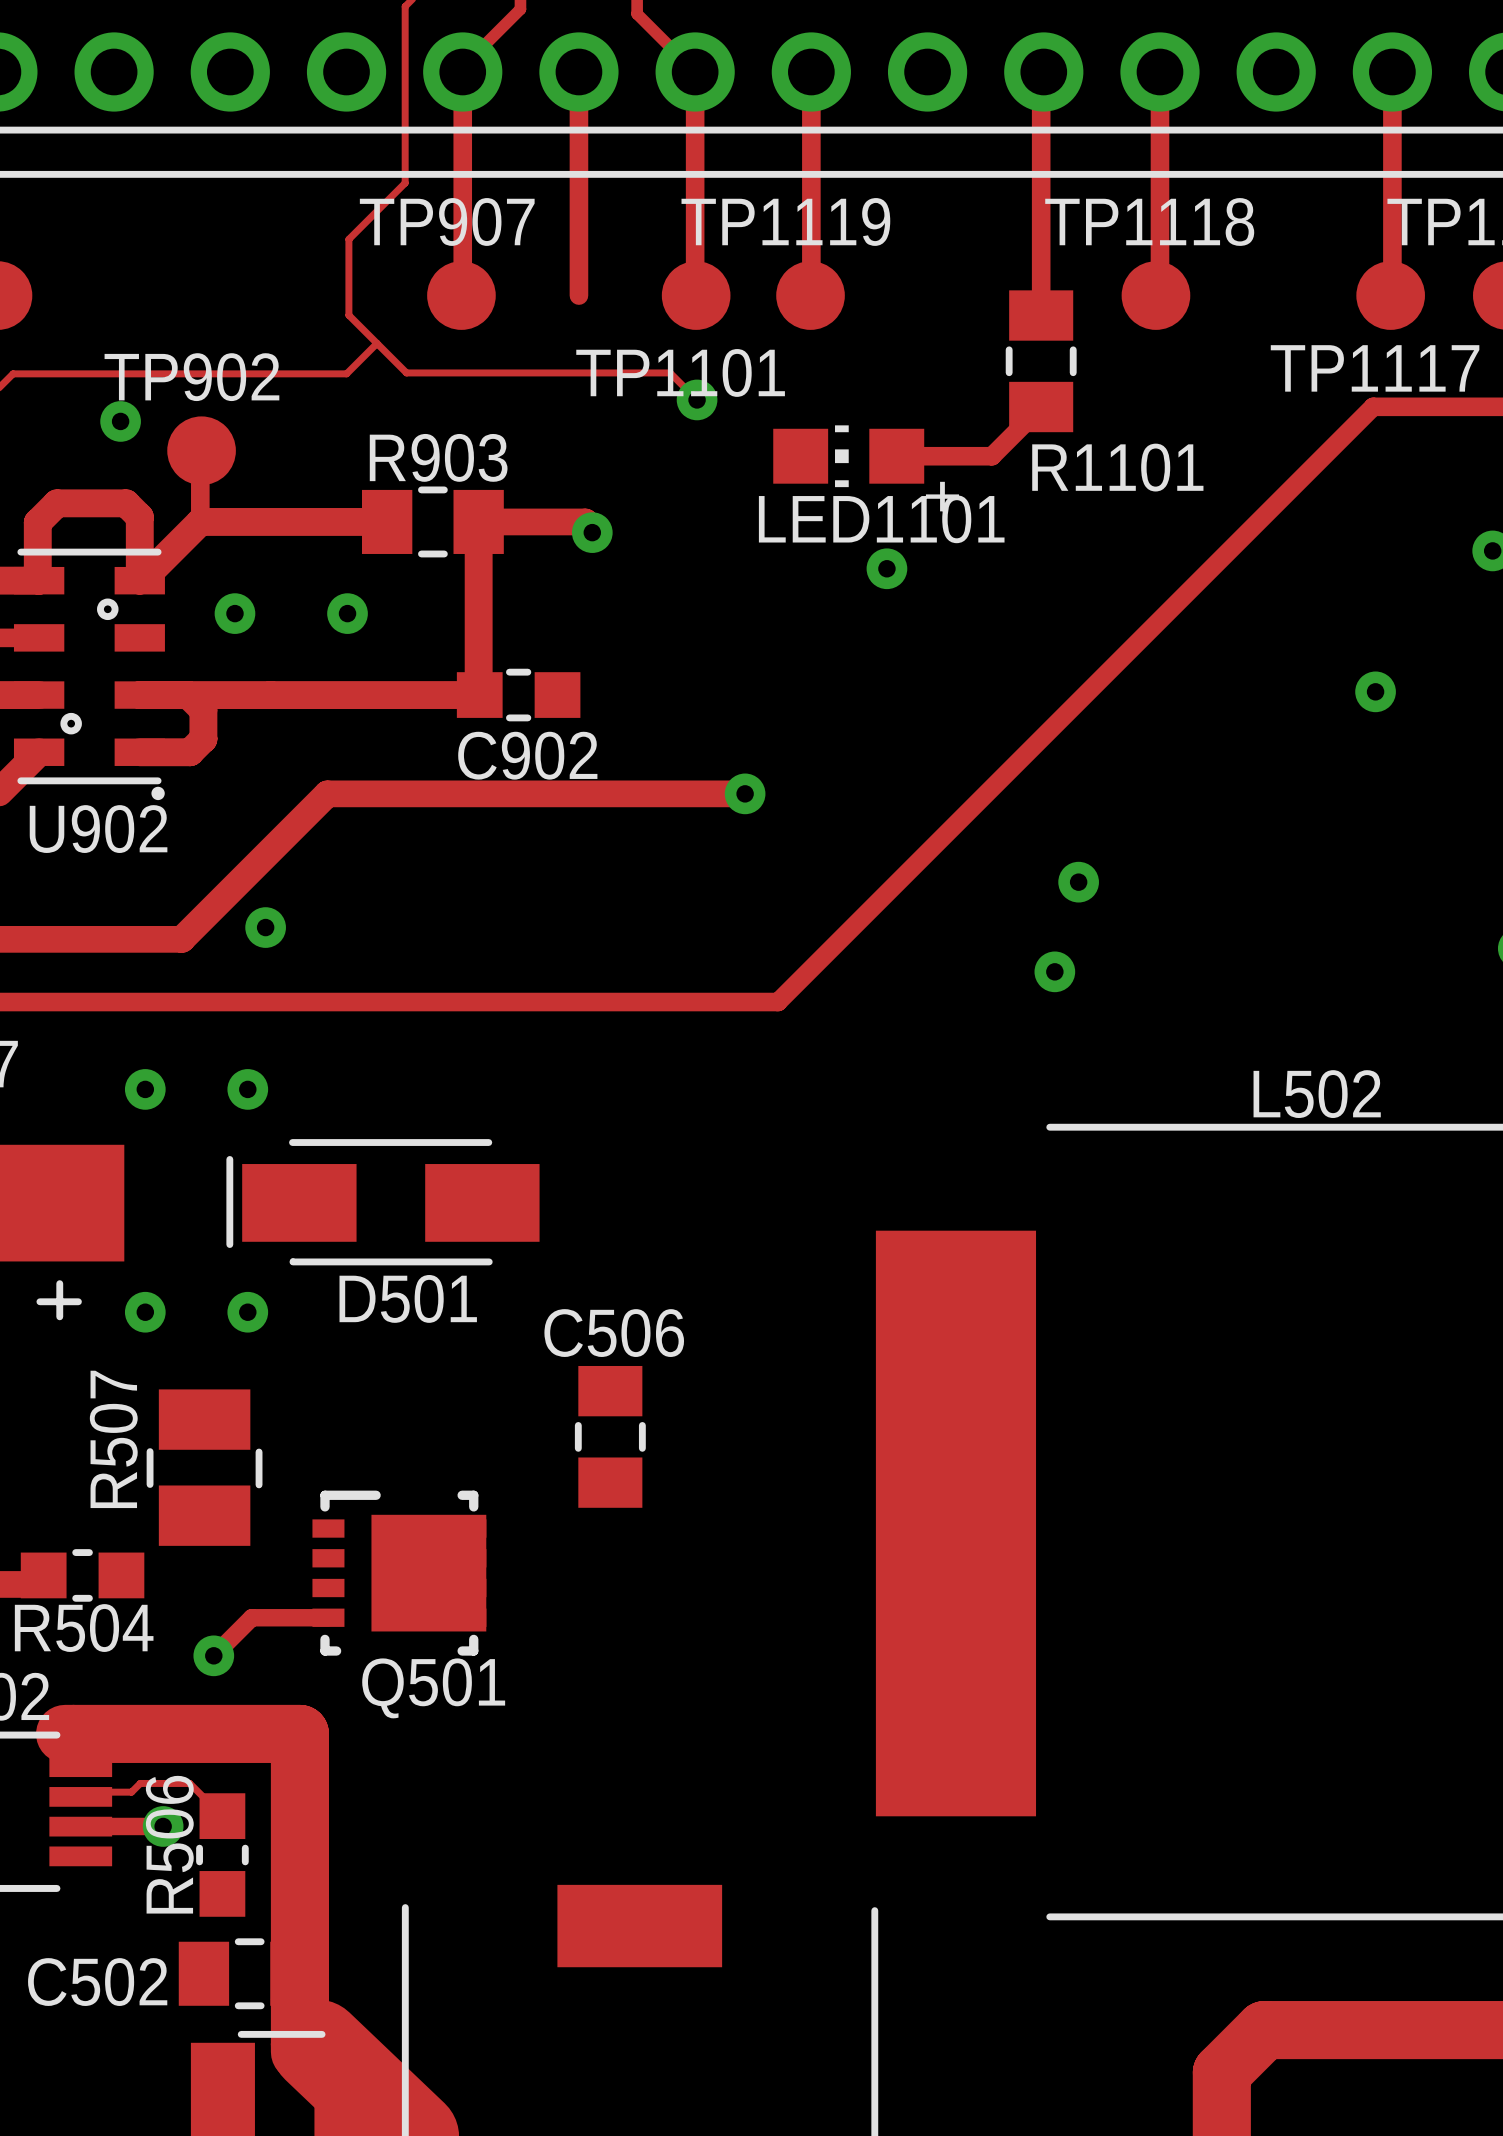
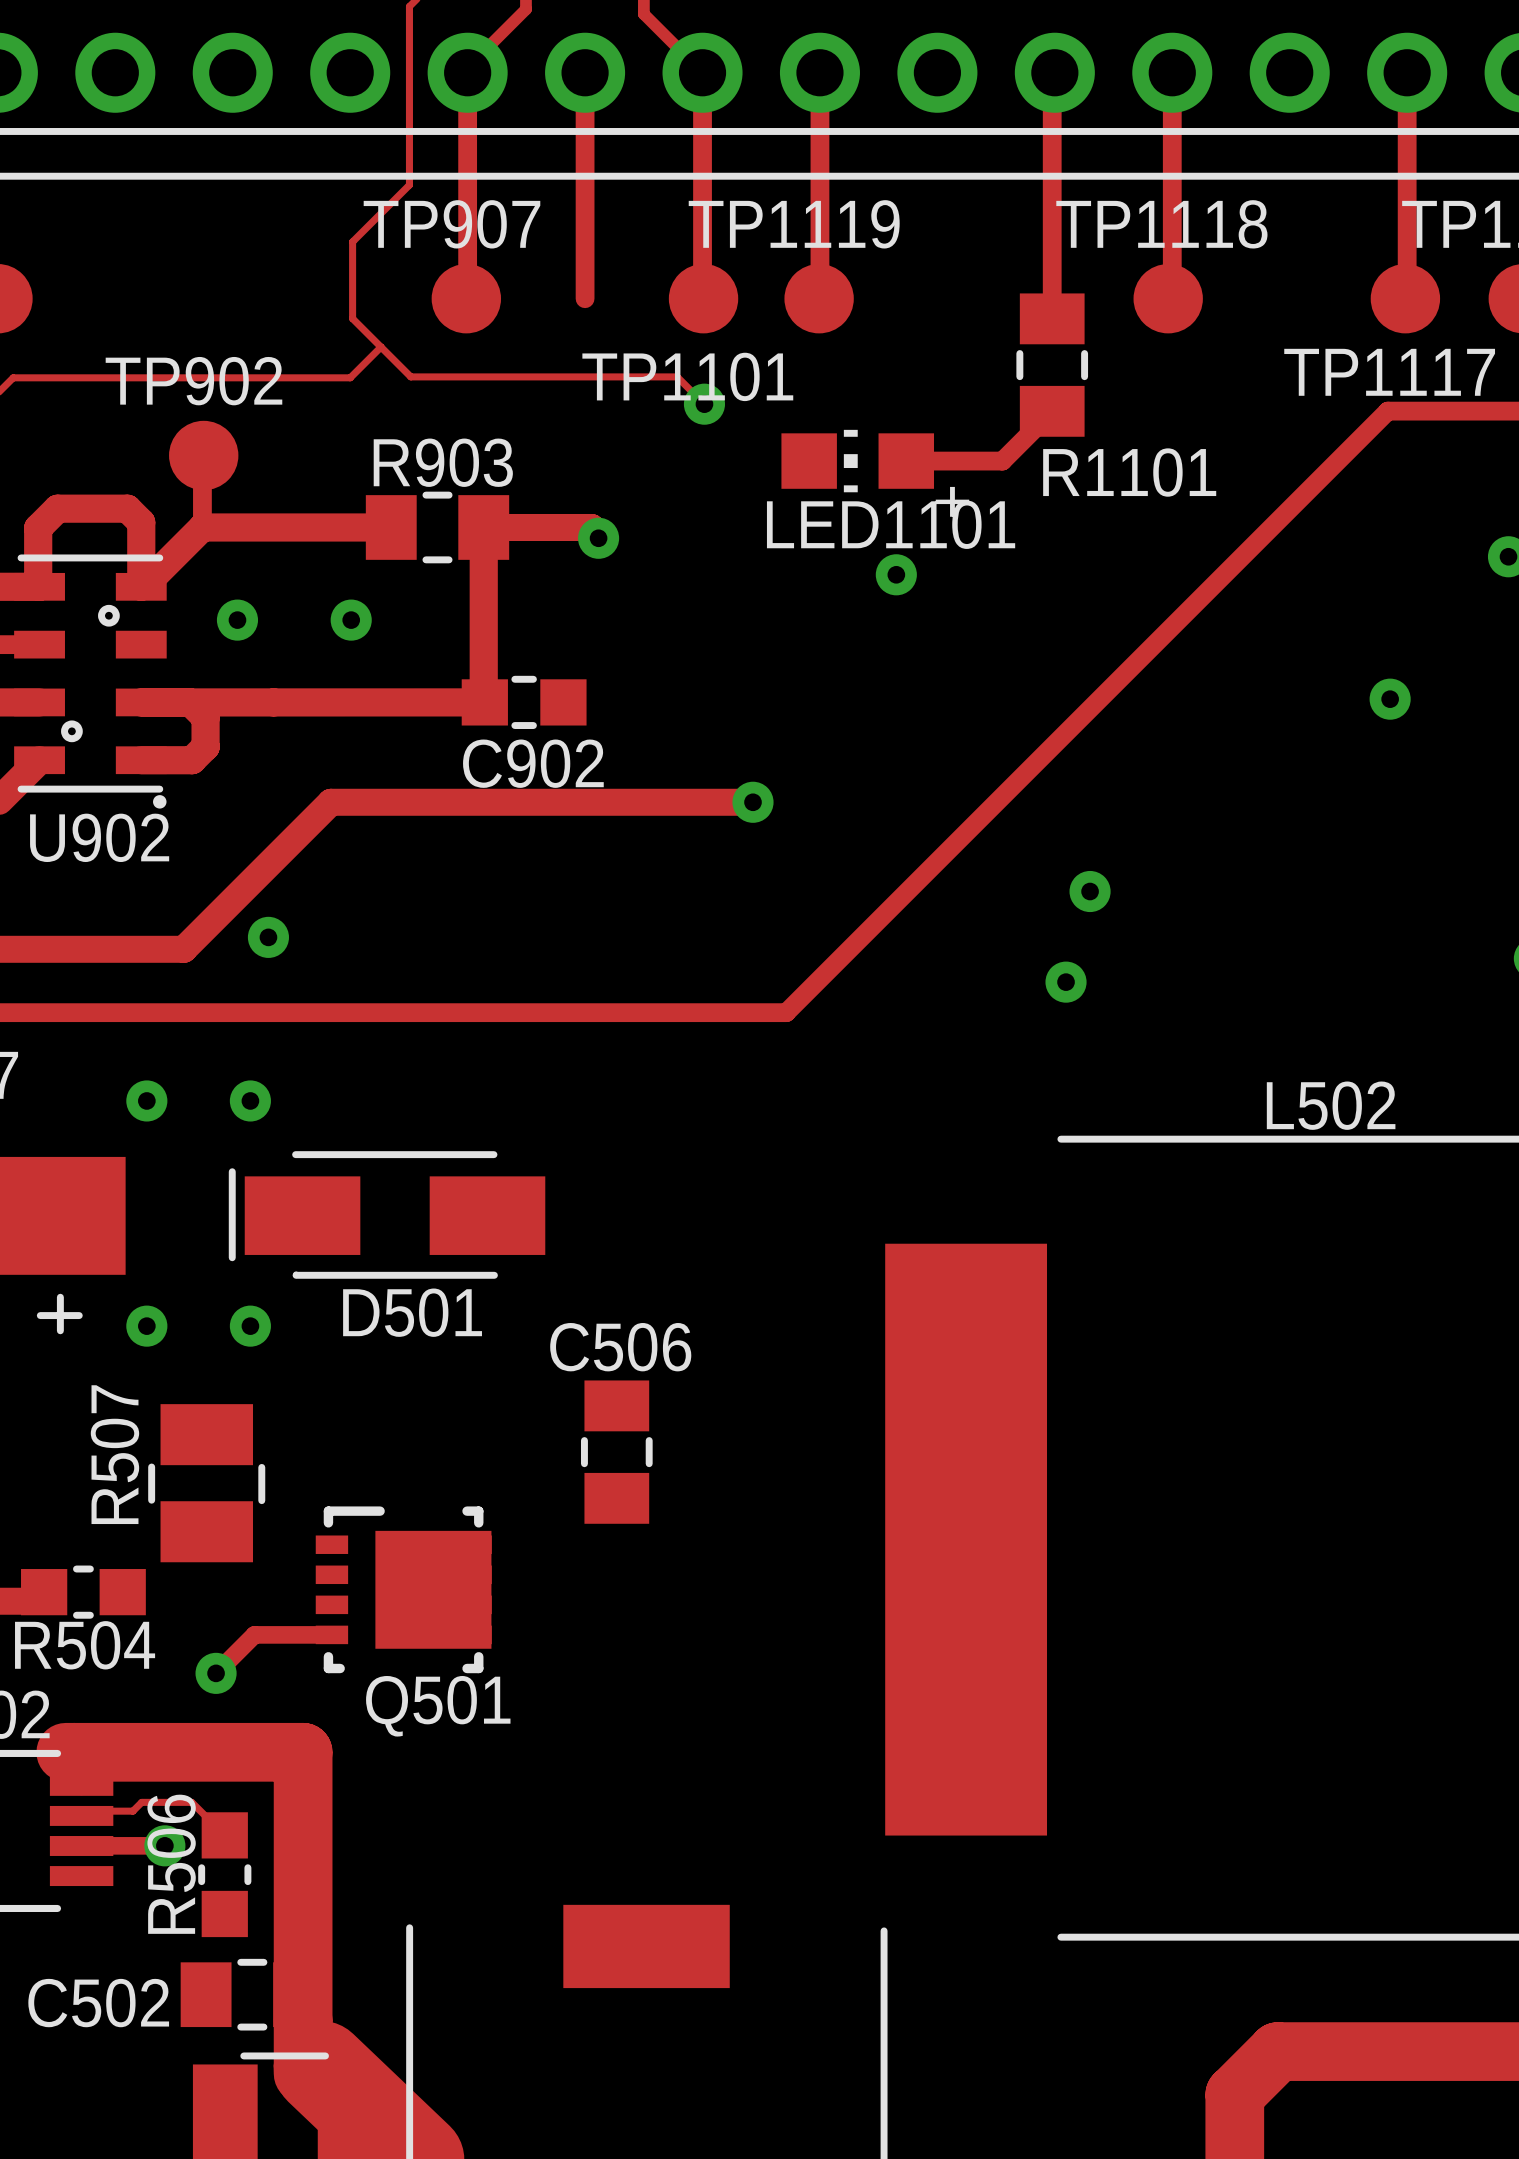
via: (120, 421) -> none

